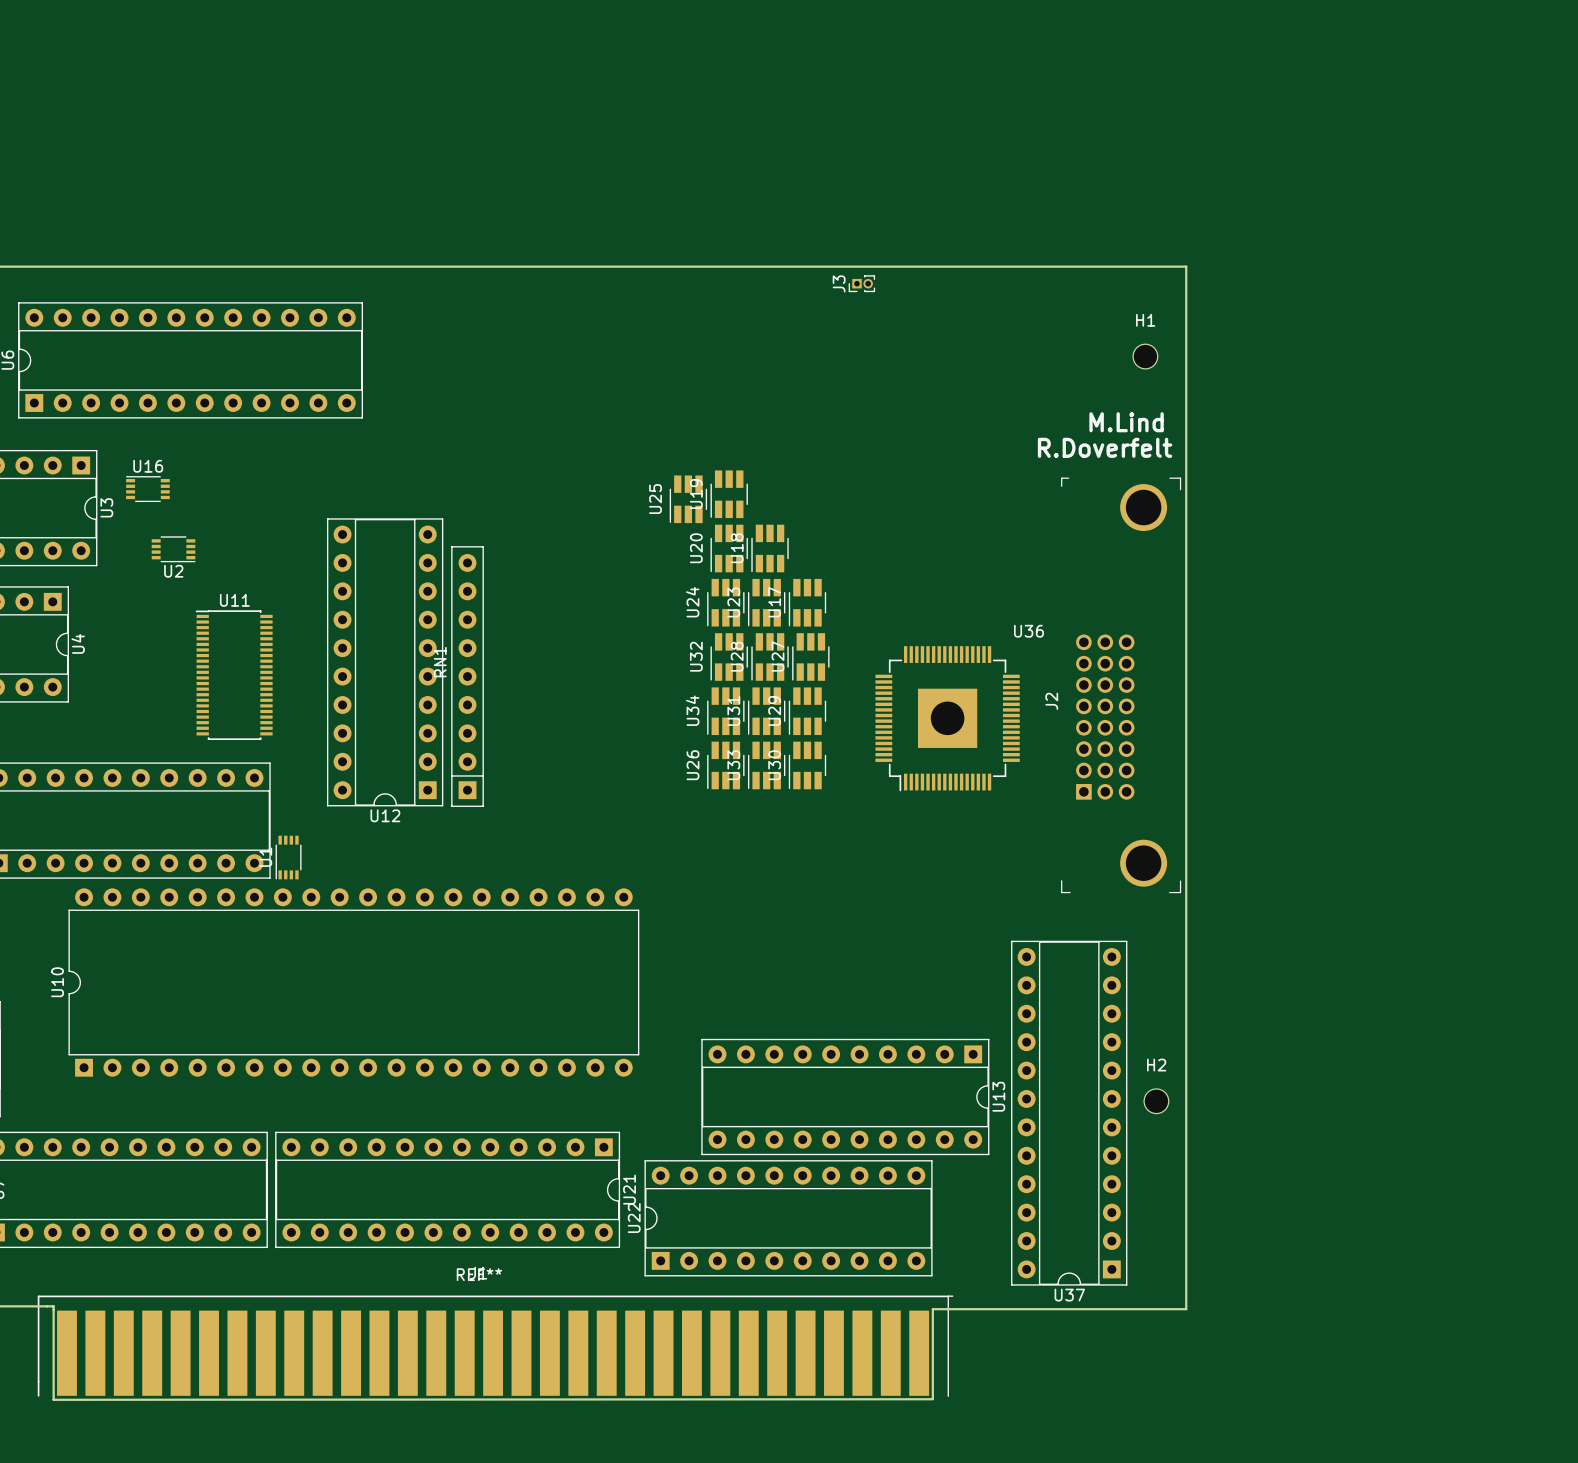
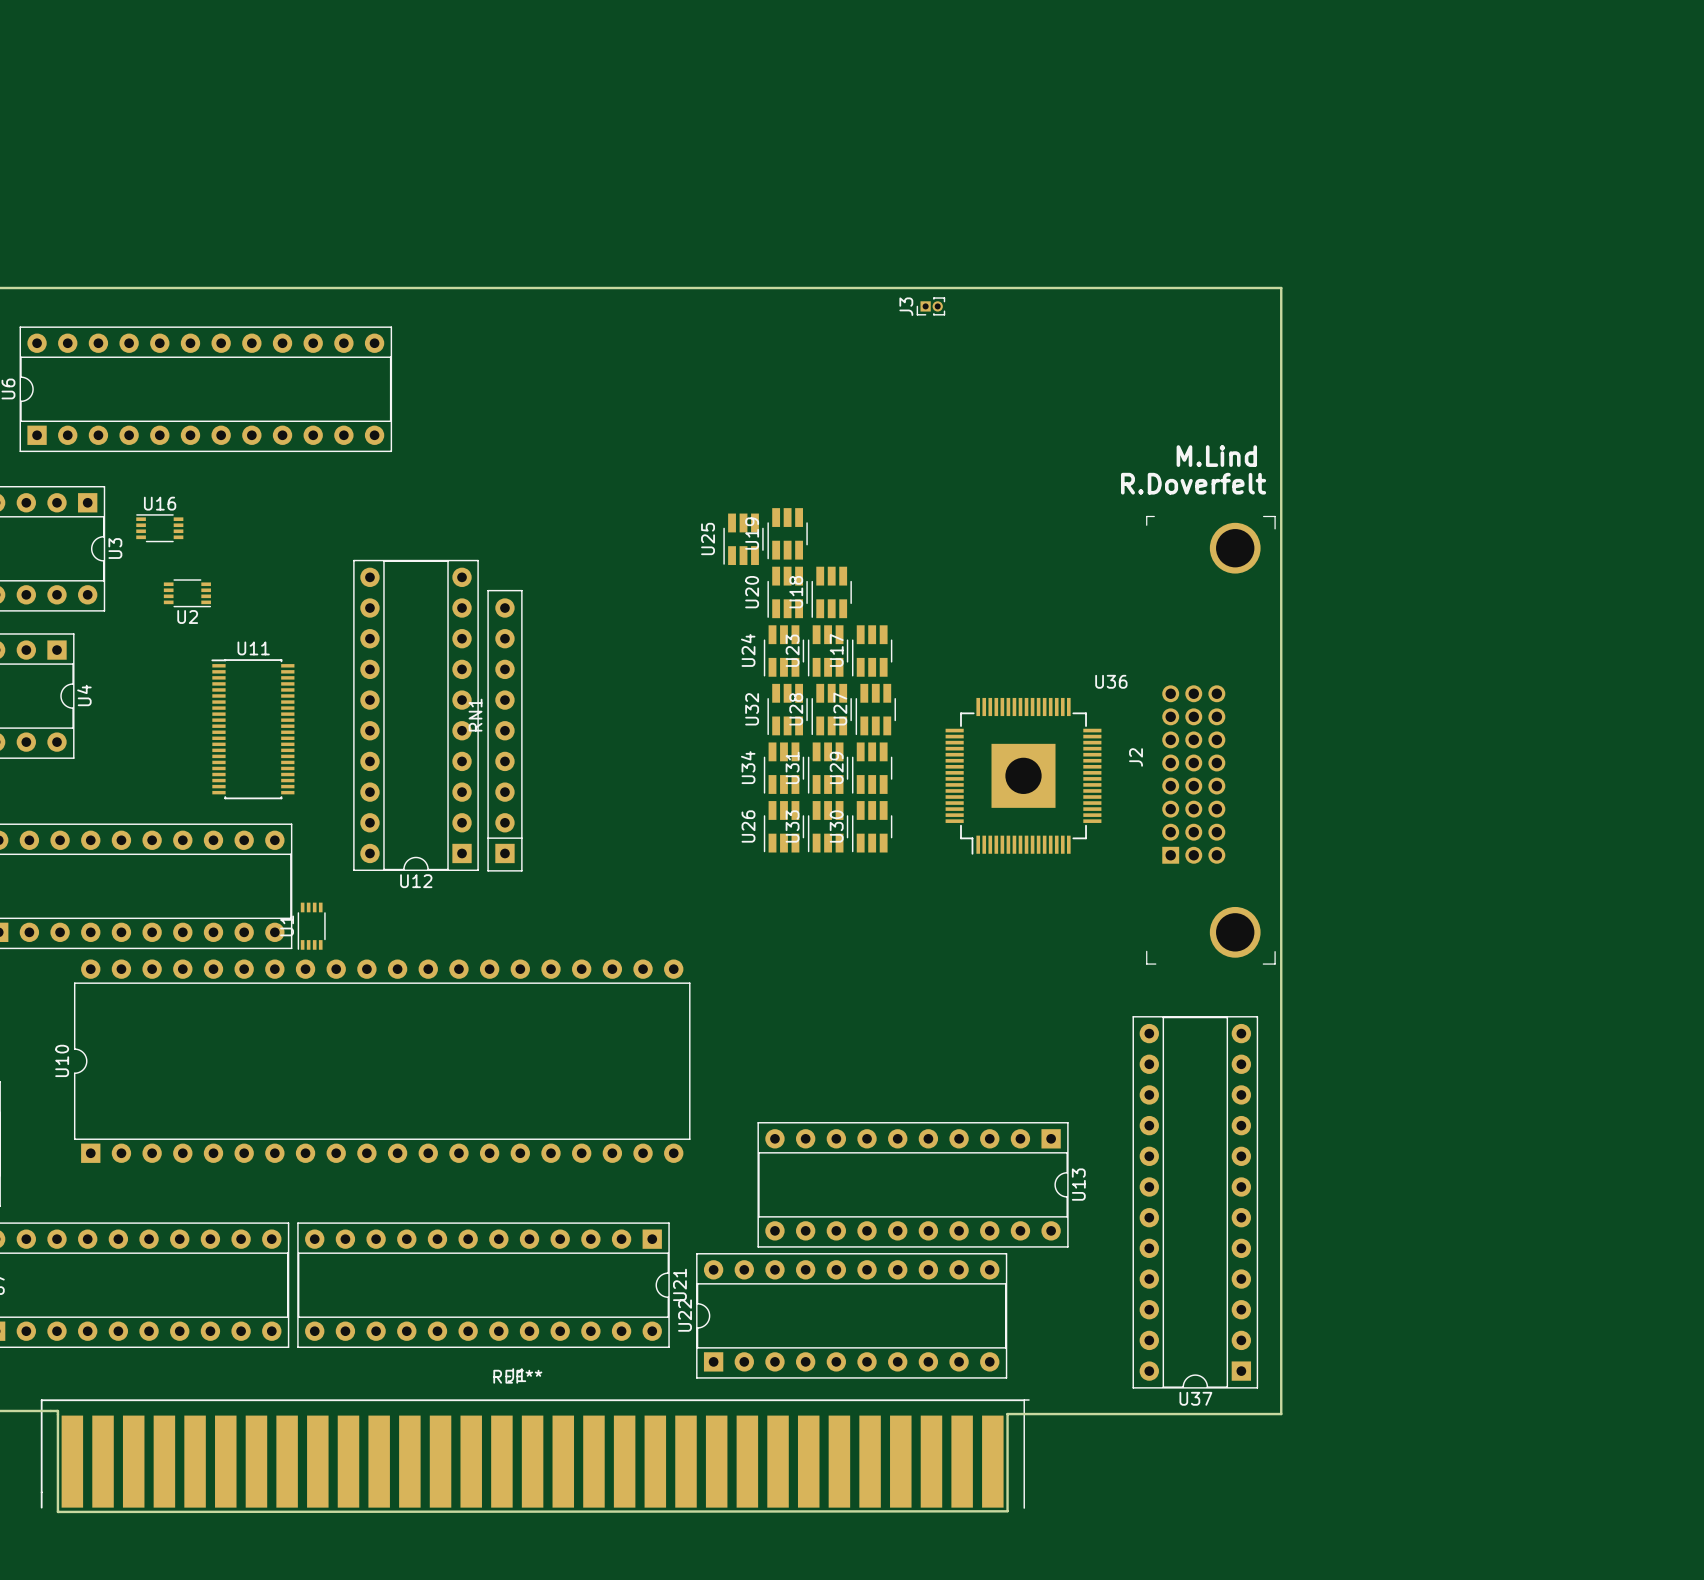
H1: (1145, 356) -> none
H2: (1156, 1101) -> none
U37 position: (1069, 1113) -> (1195, 1202)

